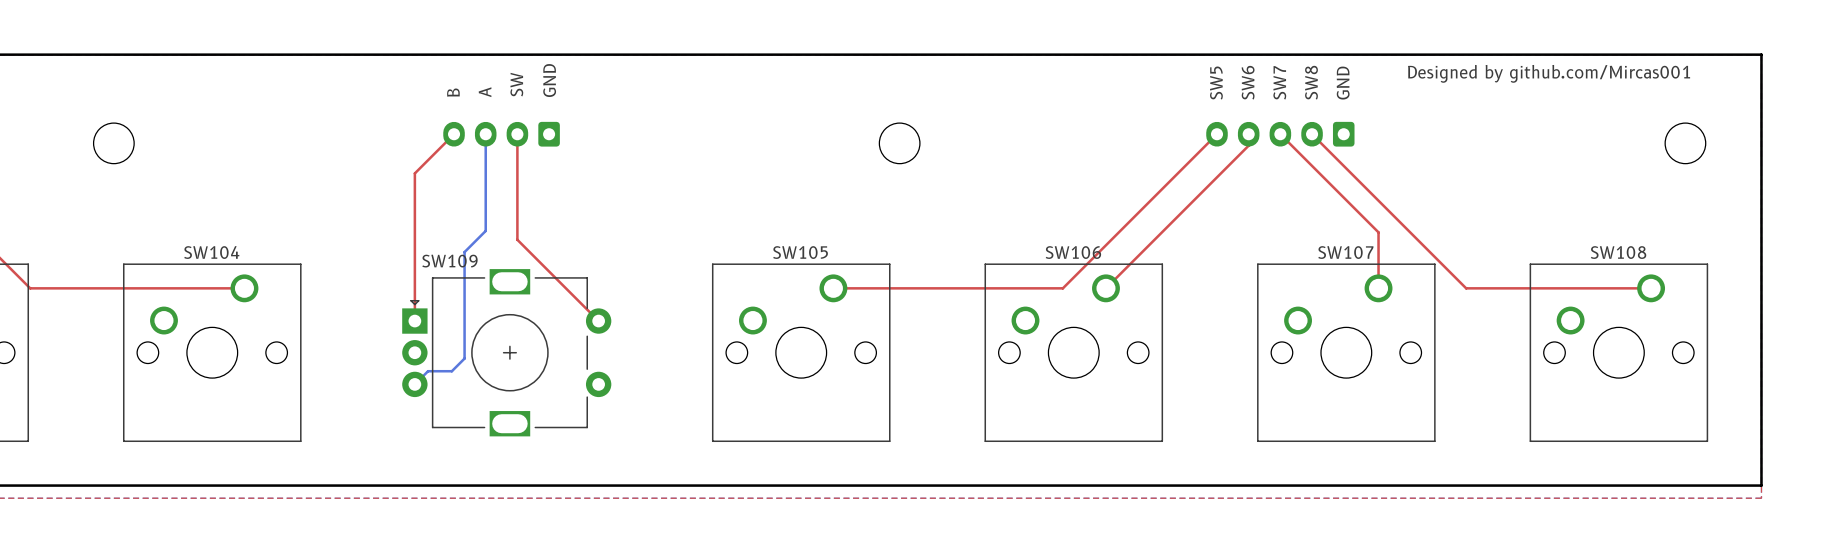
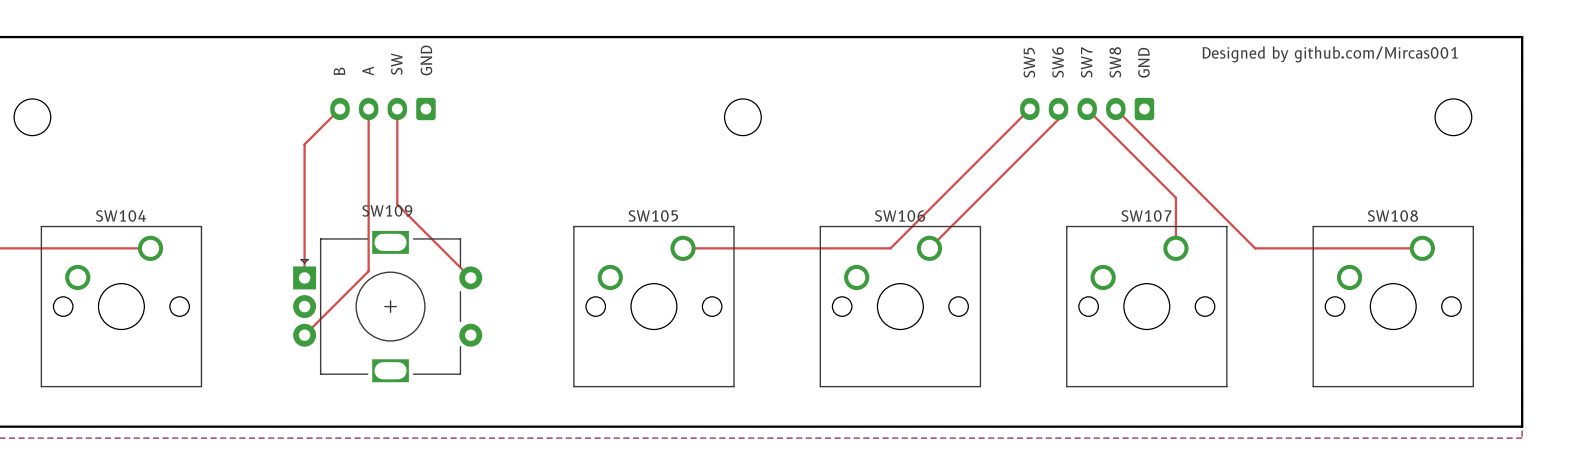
top track: none -> (368, 109) (368, 271) (304, 335)
bottom track: (485, 134) (485, 230) (464, 252) (464, 358) (451, 371) (428, 371) (414, 384) -> none
SW109 name position: SW109 (449, 261) -> SW109 (387, 210)

